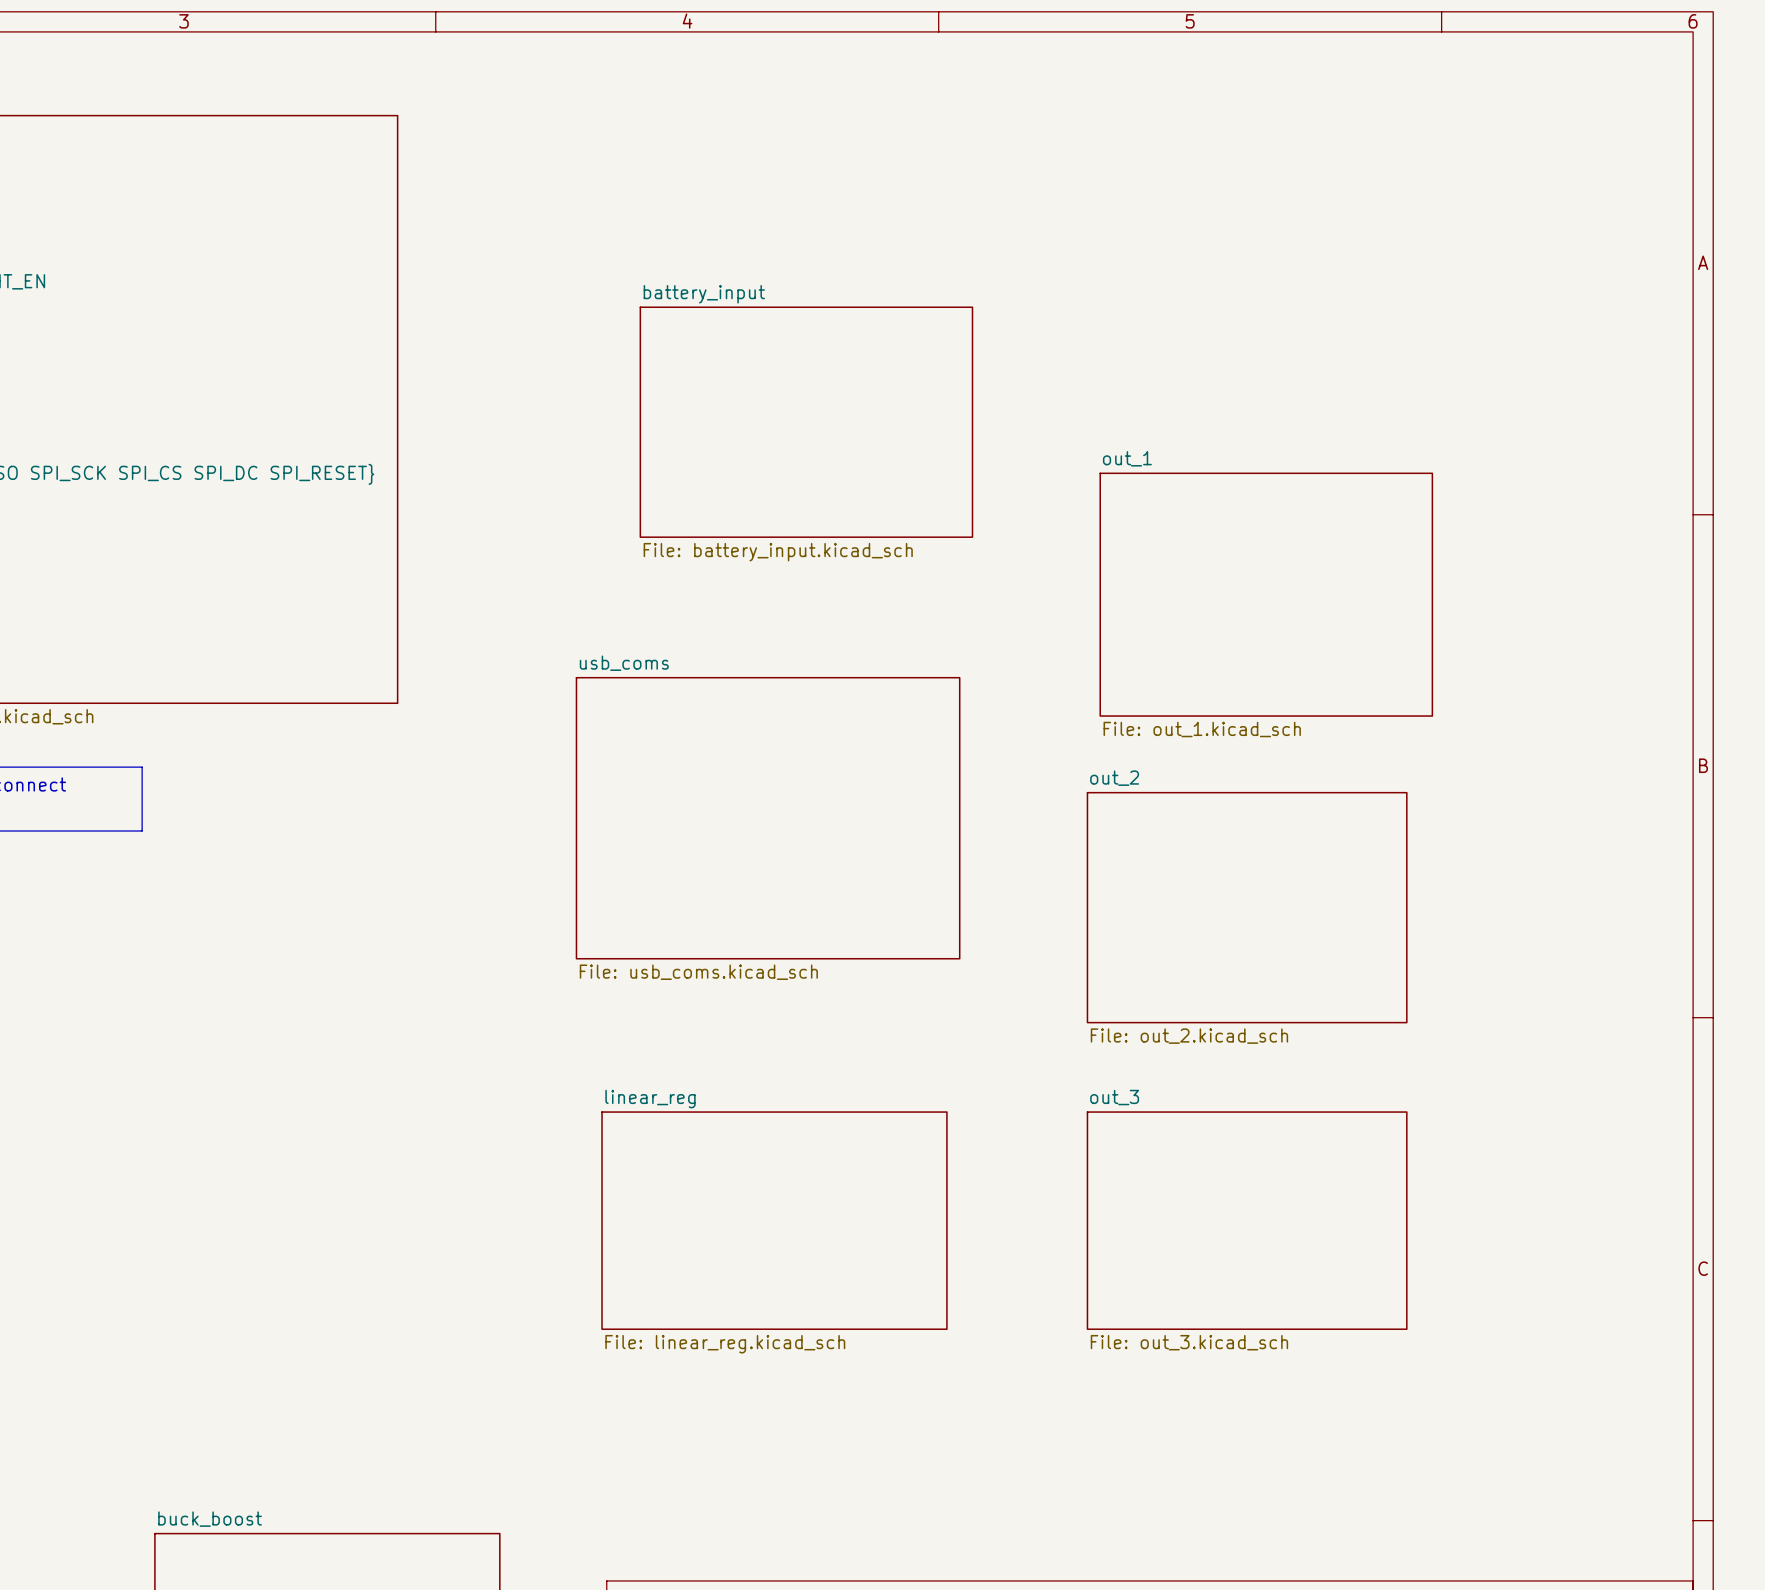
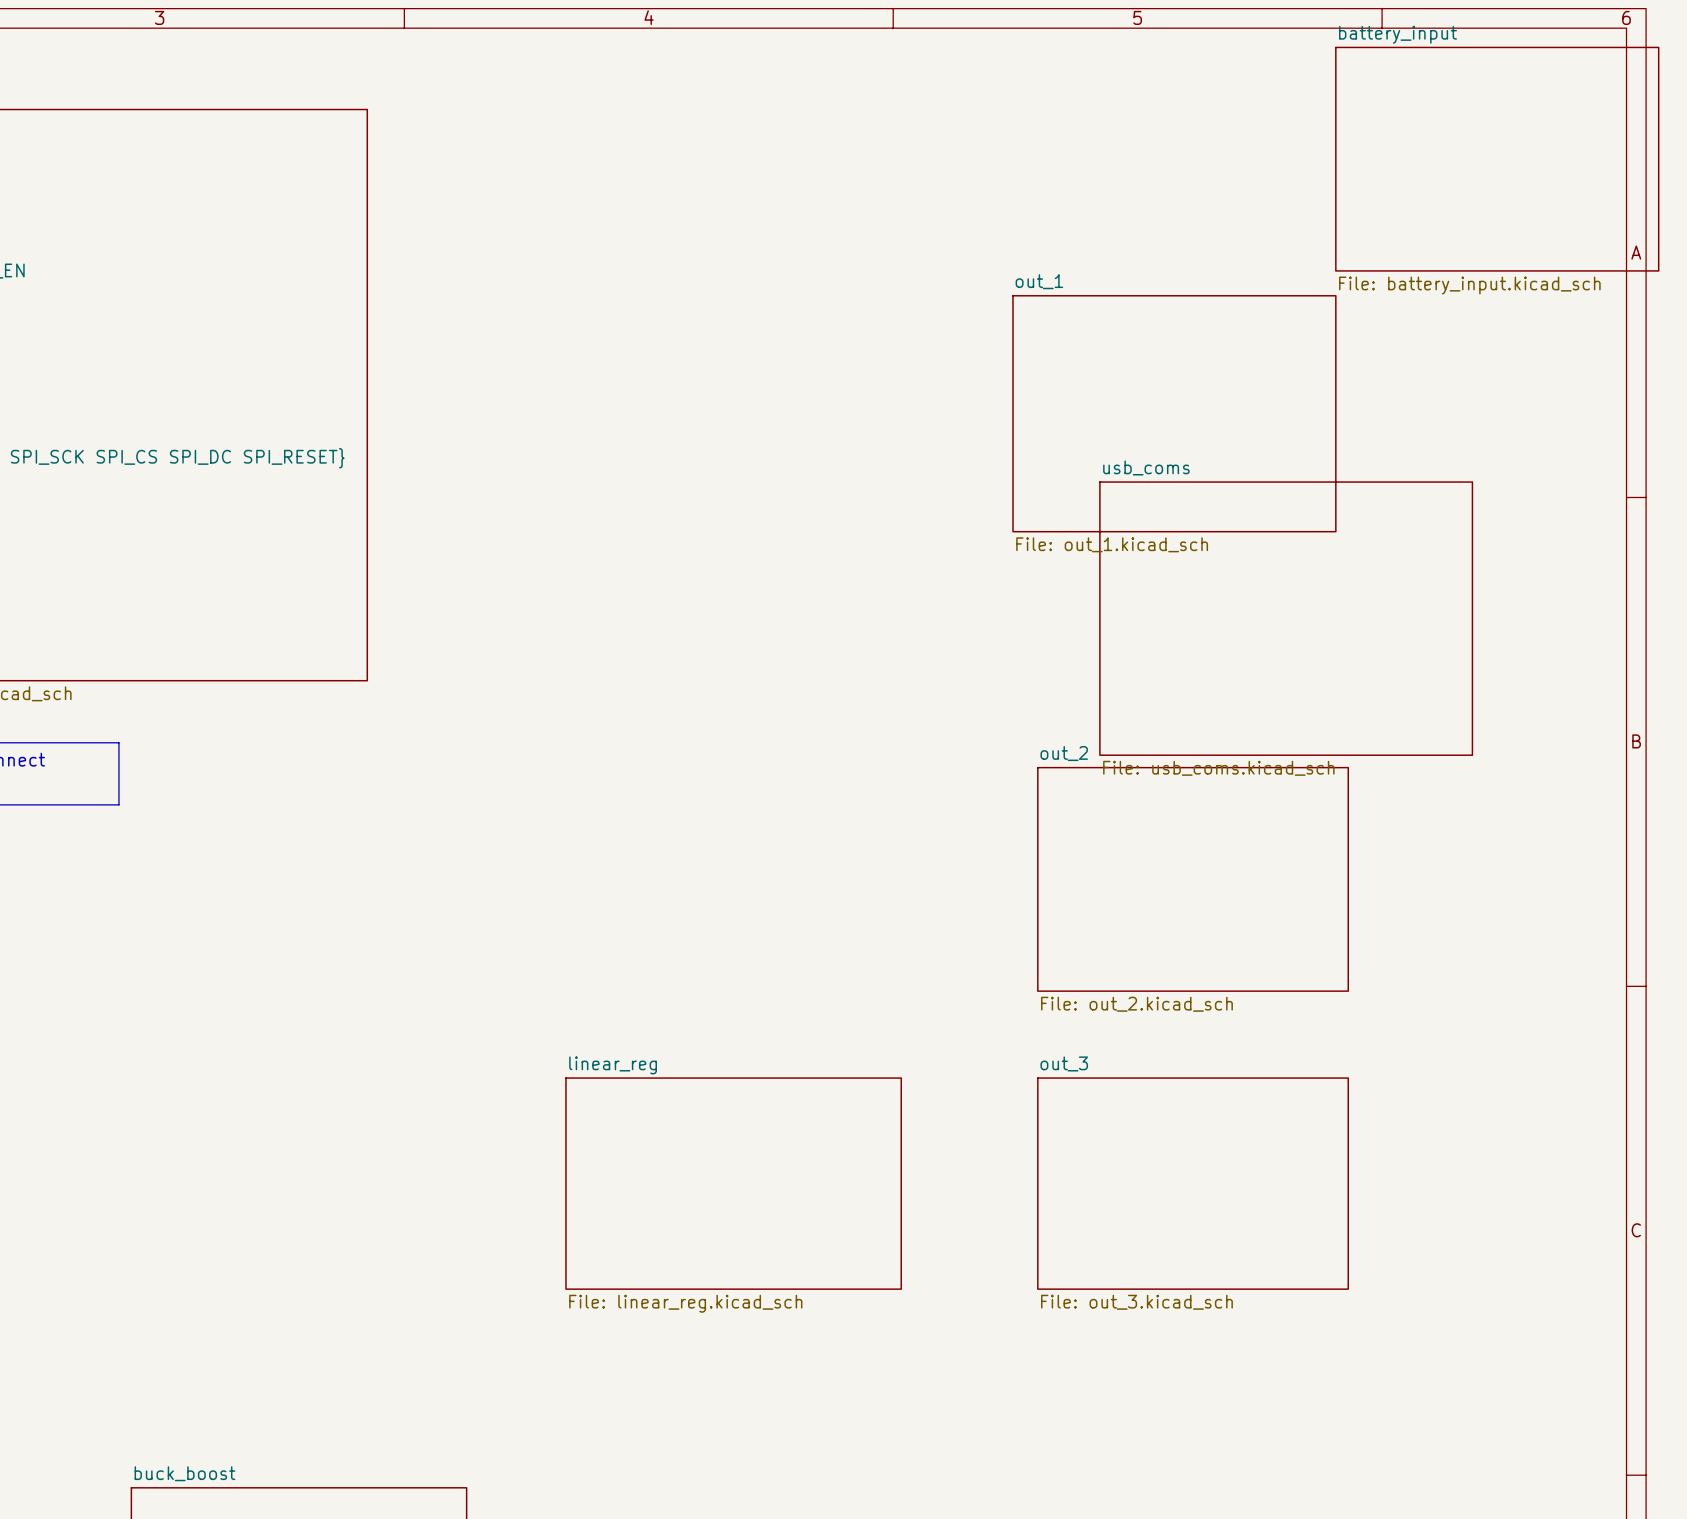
sheet battery_input: none -> File: battery_input.kicad_sch (1497, 159)
sheet battery_input: File: battery_input.kicad_sch (806, 422) -> none
sheet out_1 position: (1266, 594) -> (1174, 413)
sheet usb_coms: none -> File: usb_coms.kicad_sch (1286, 618)
sheet usb_coms: File: usb_coms.kicad_sch (768, 818) -> none

